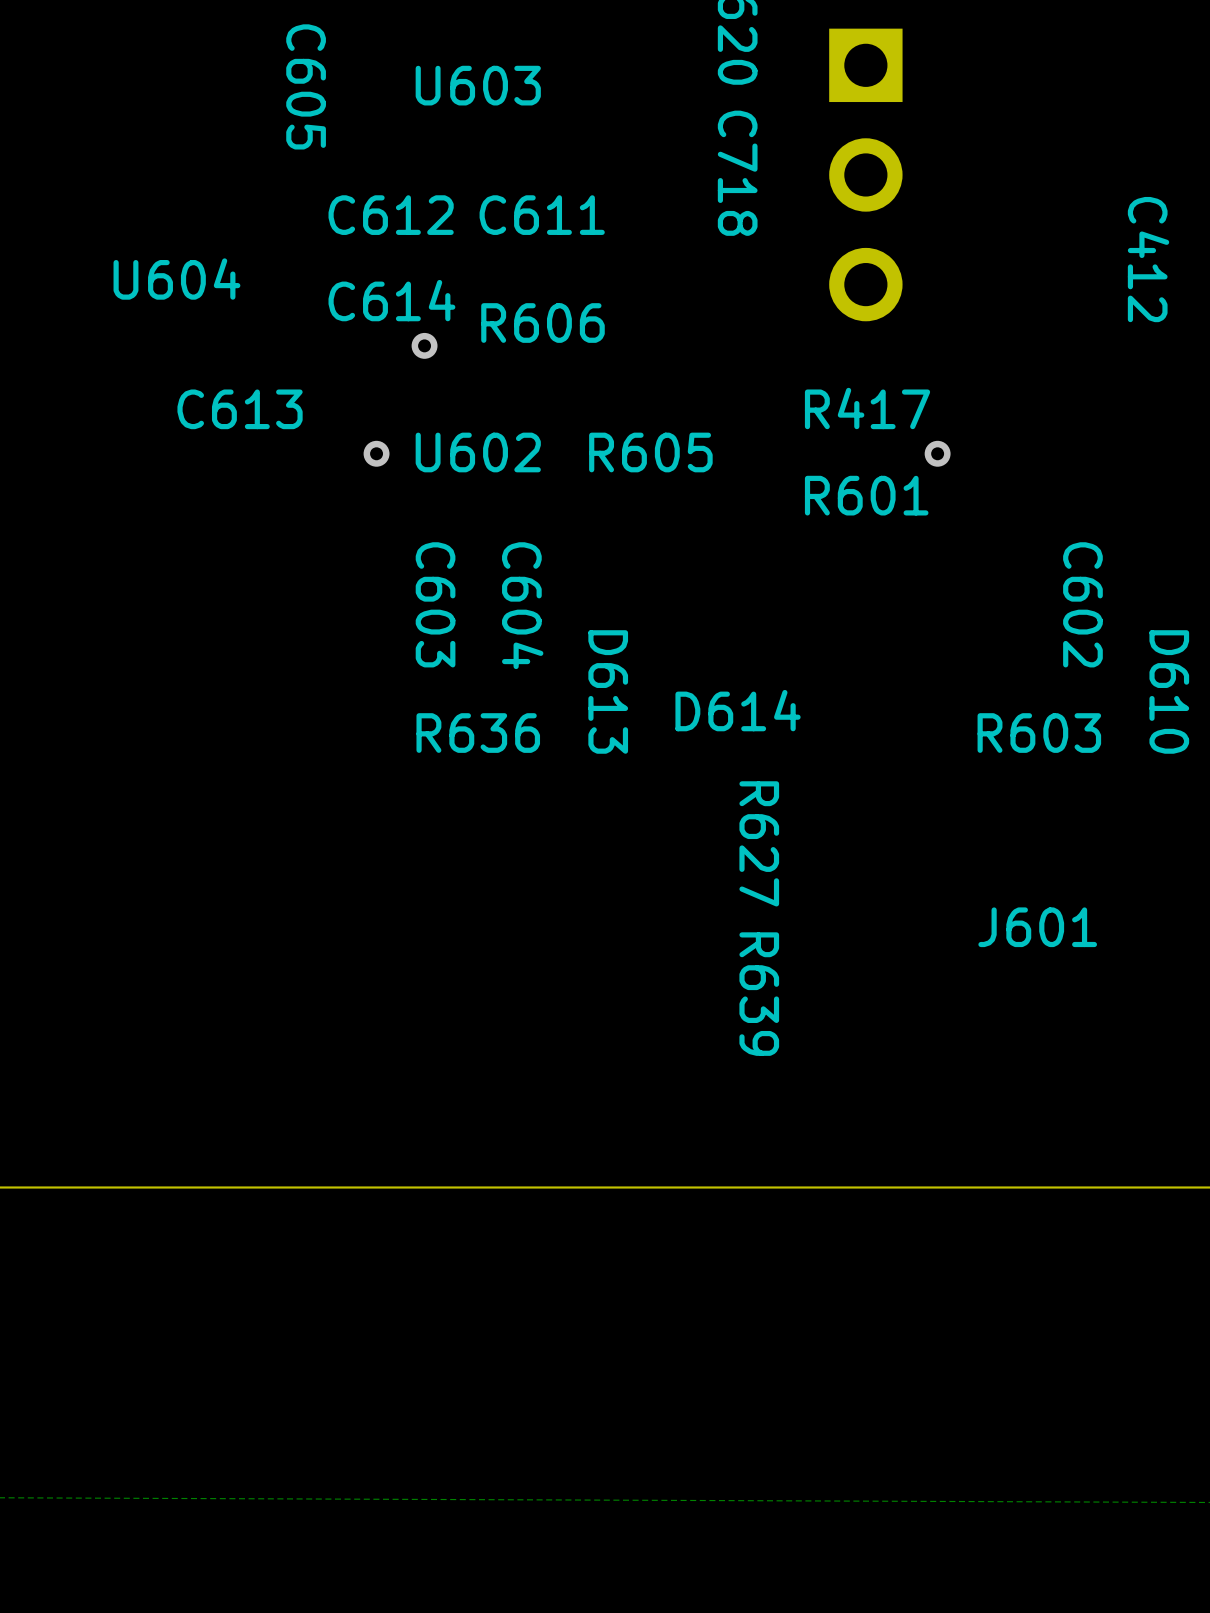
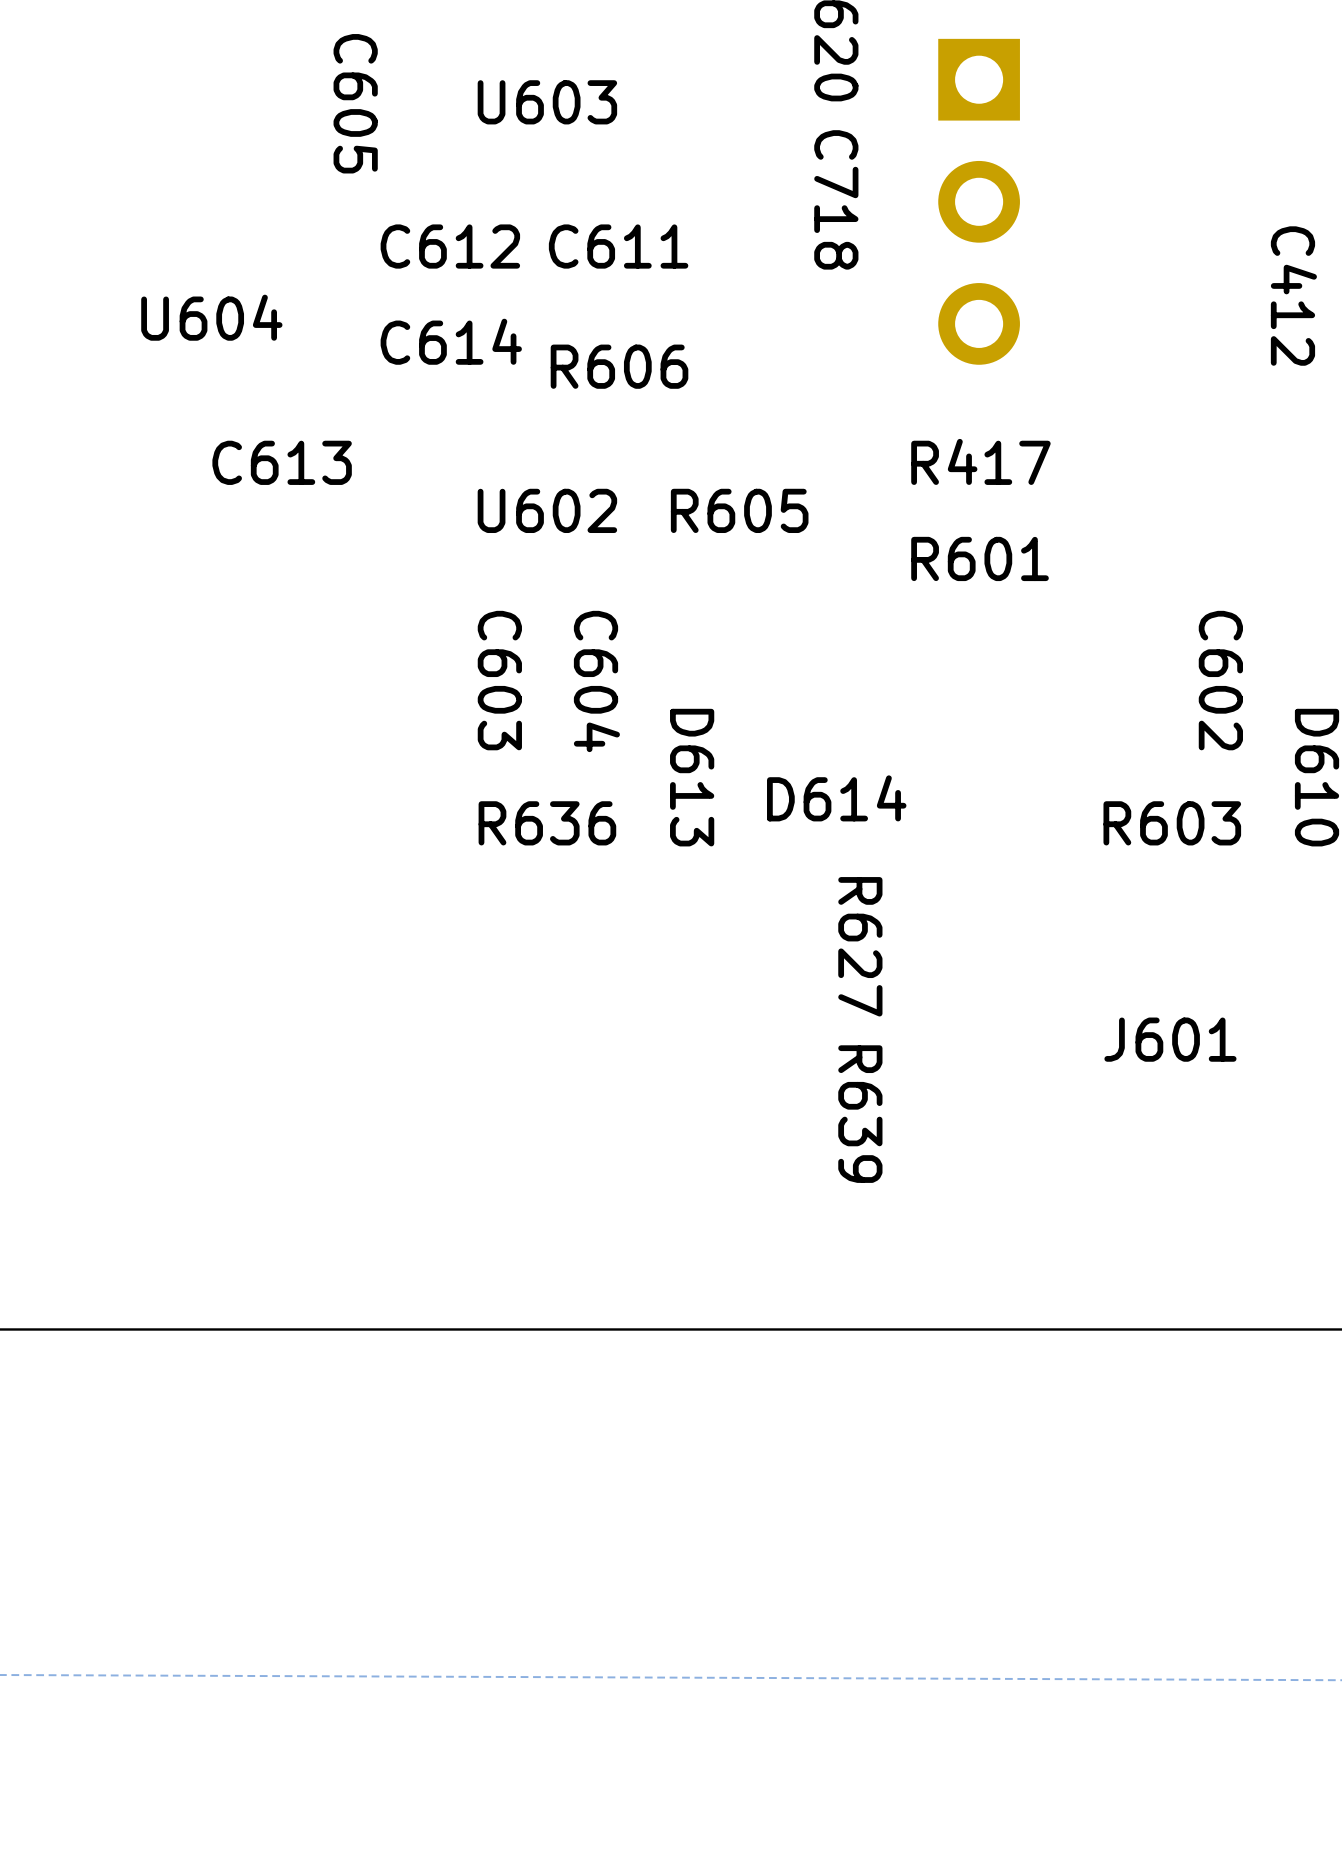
via: (424, 345) -> none
via: (376, 453) -> none
via: (937, 453) -> none

